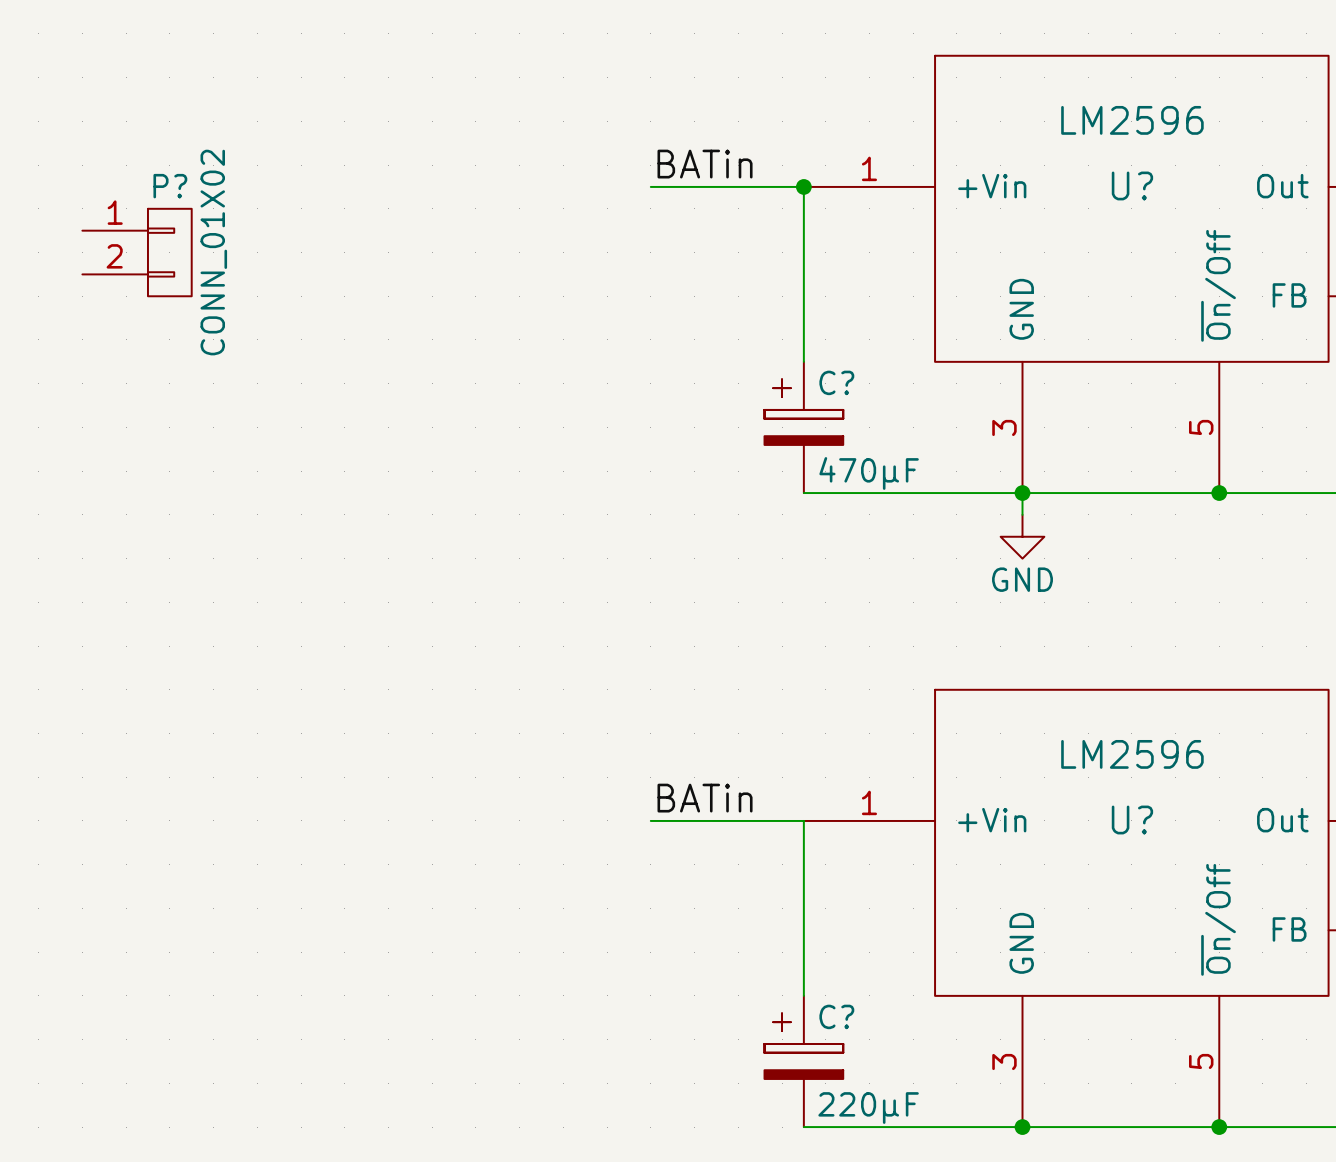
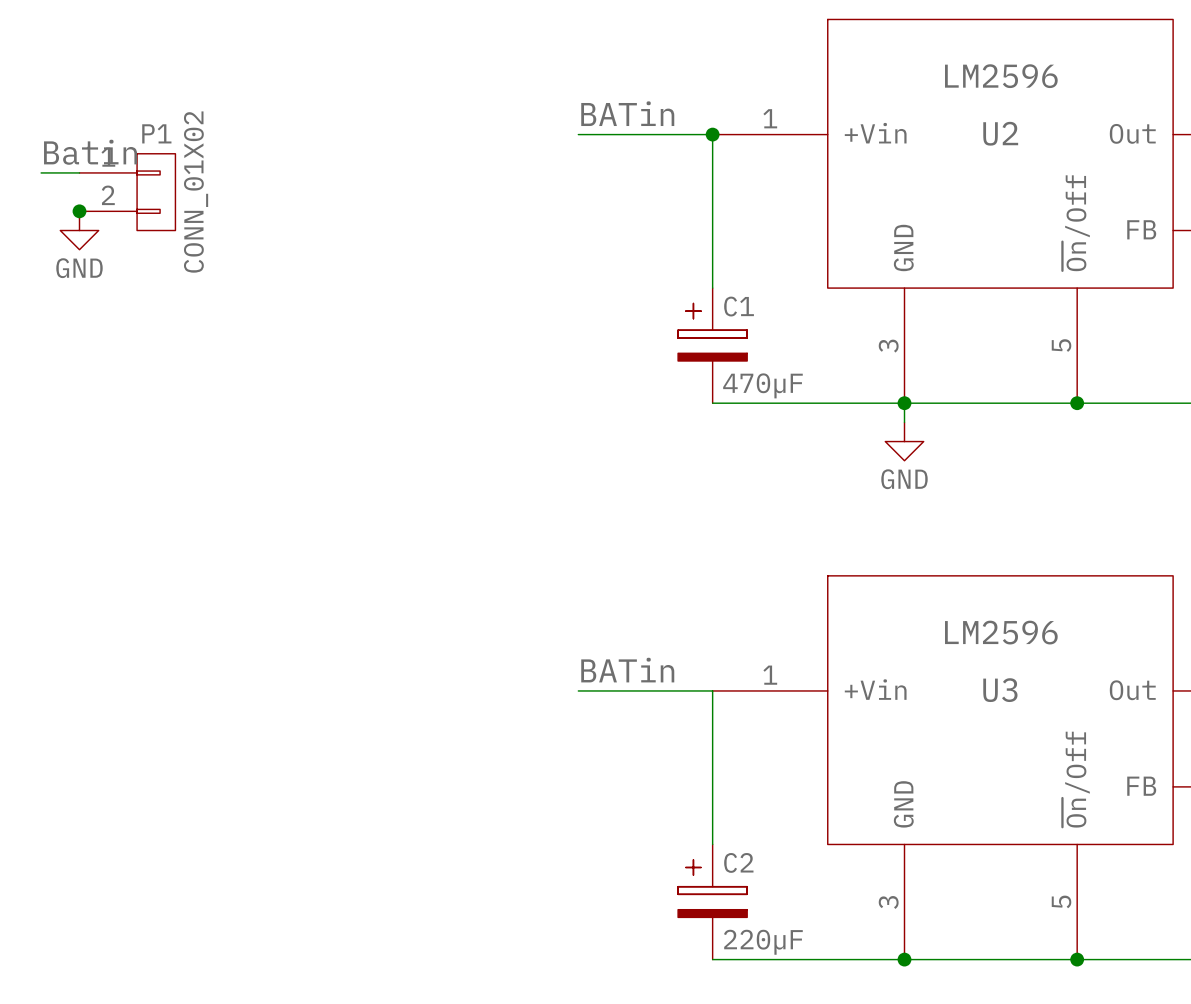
U? name: U? (1132, 185) -> U2 (1000, 133)
P? name: P? (170, 186) -> P1 (156, 133)
label: none -> Batin (90, 152)
wire: none -> (41, 172) (79, 172)
junction: none -> (79, 211)
power symbol: none -> GND (79, 230)
C? name: C? (836, 382) -> C1 (739, 306)
U? name: U? (1132, 820) -> U3 (1000, 690)
C? name: C? (836, 1016) -> C2 (738, 862)

